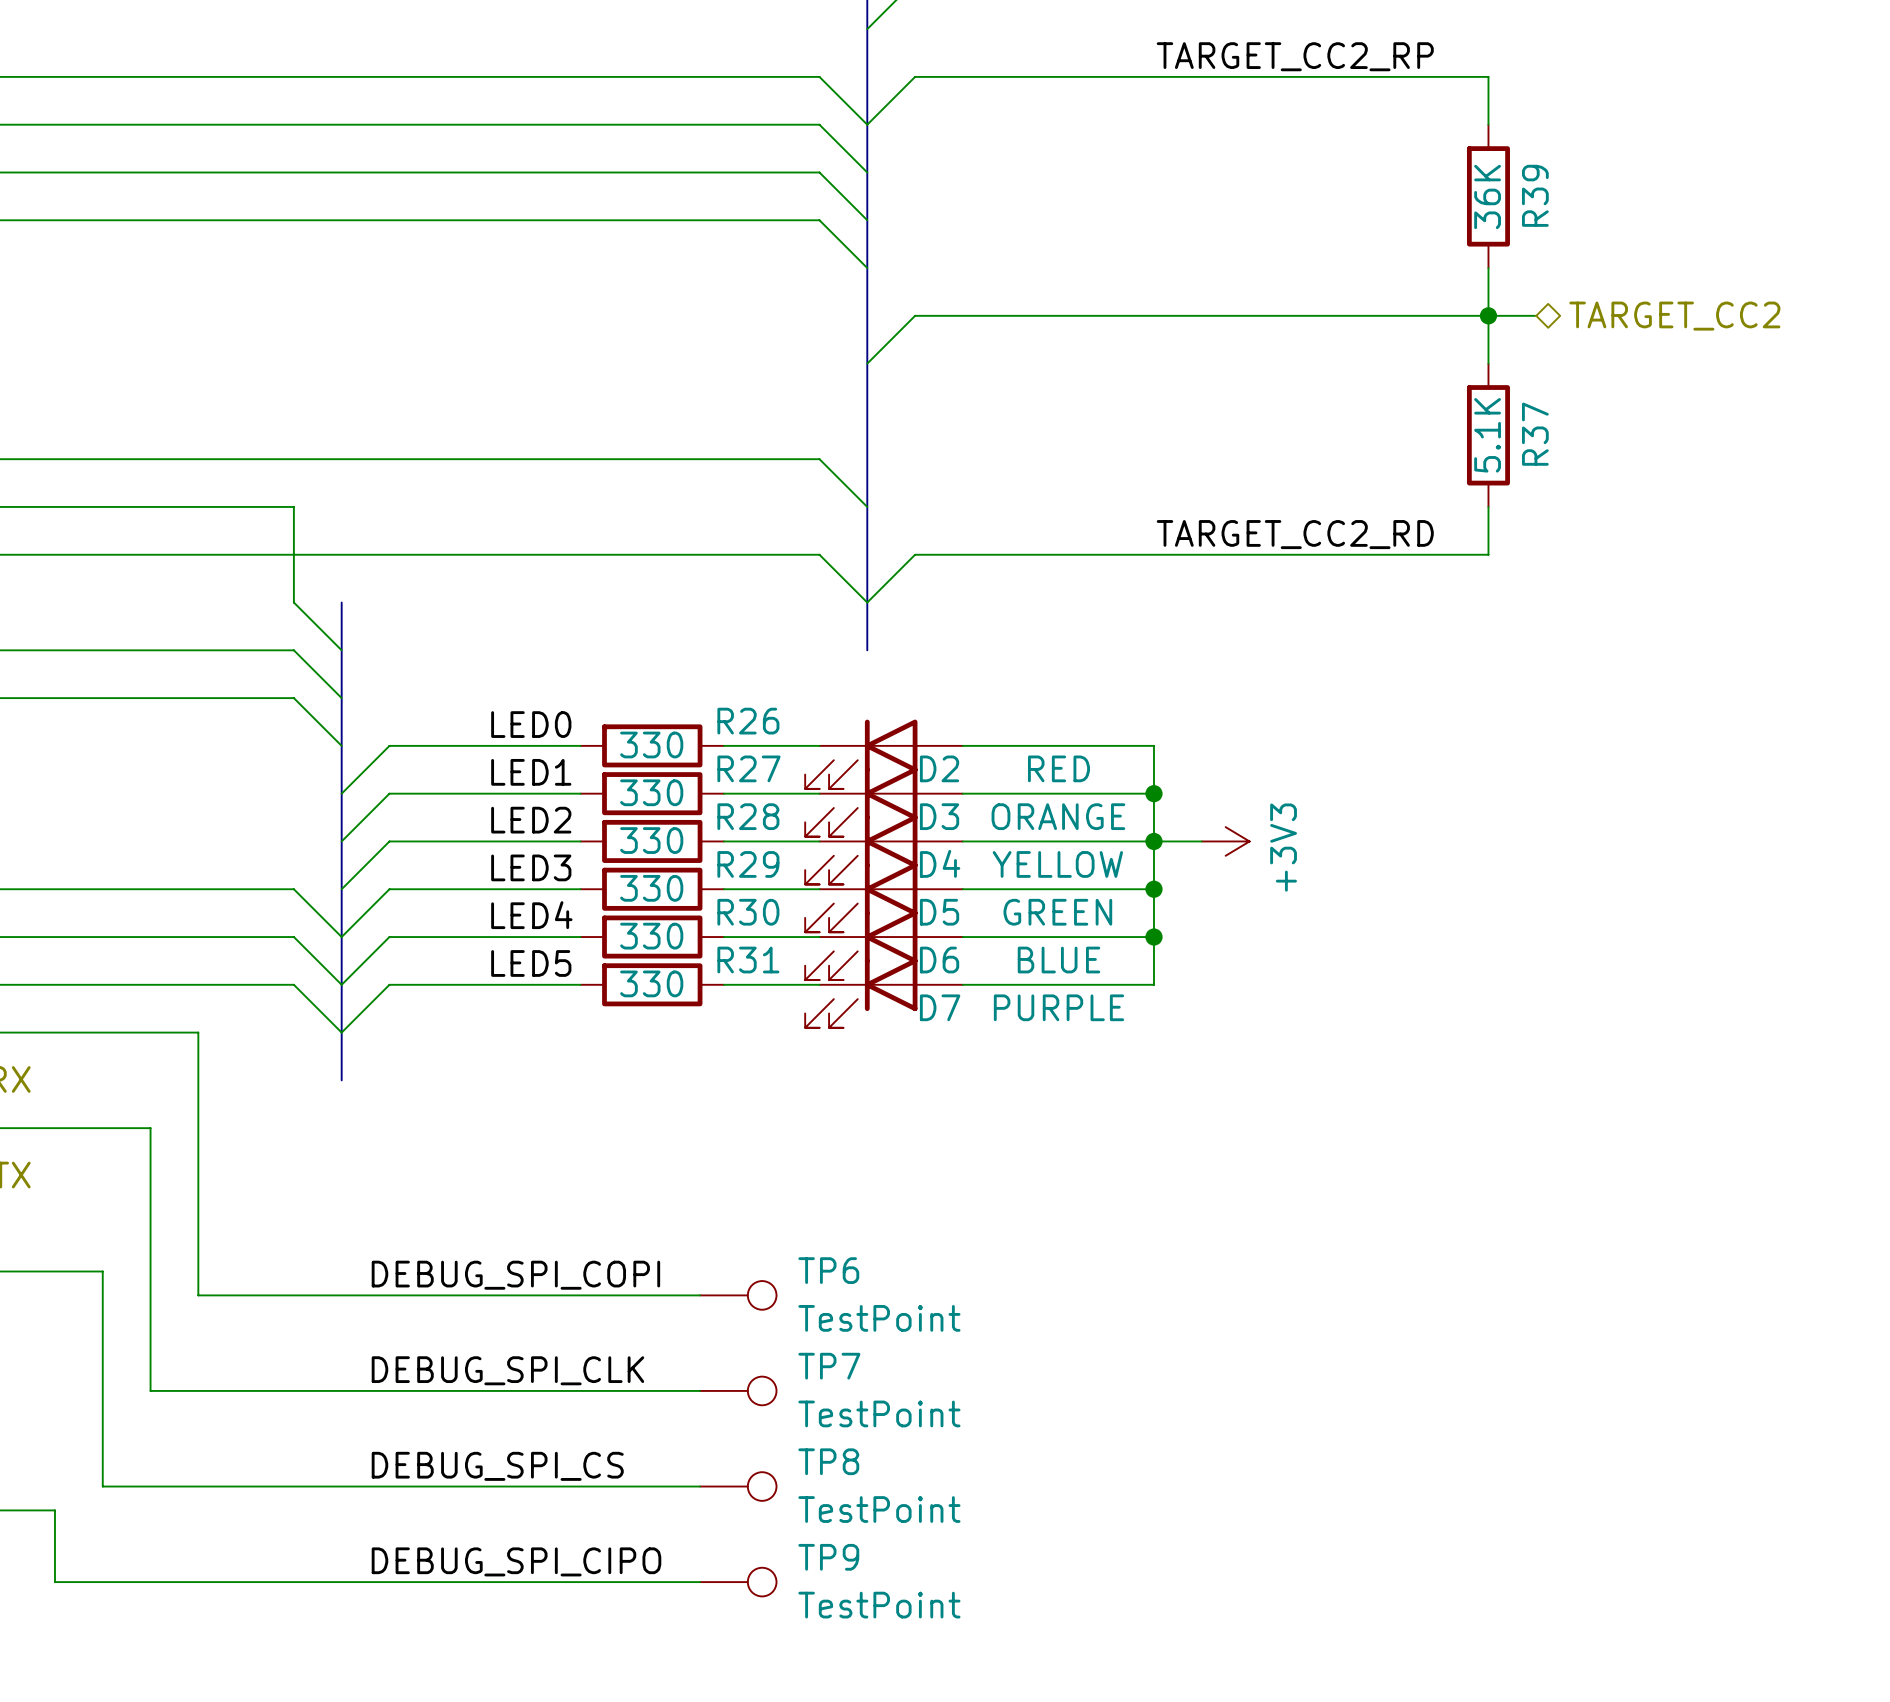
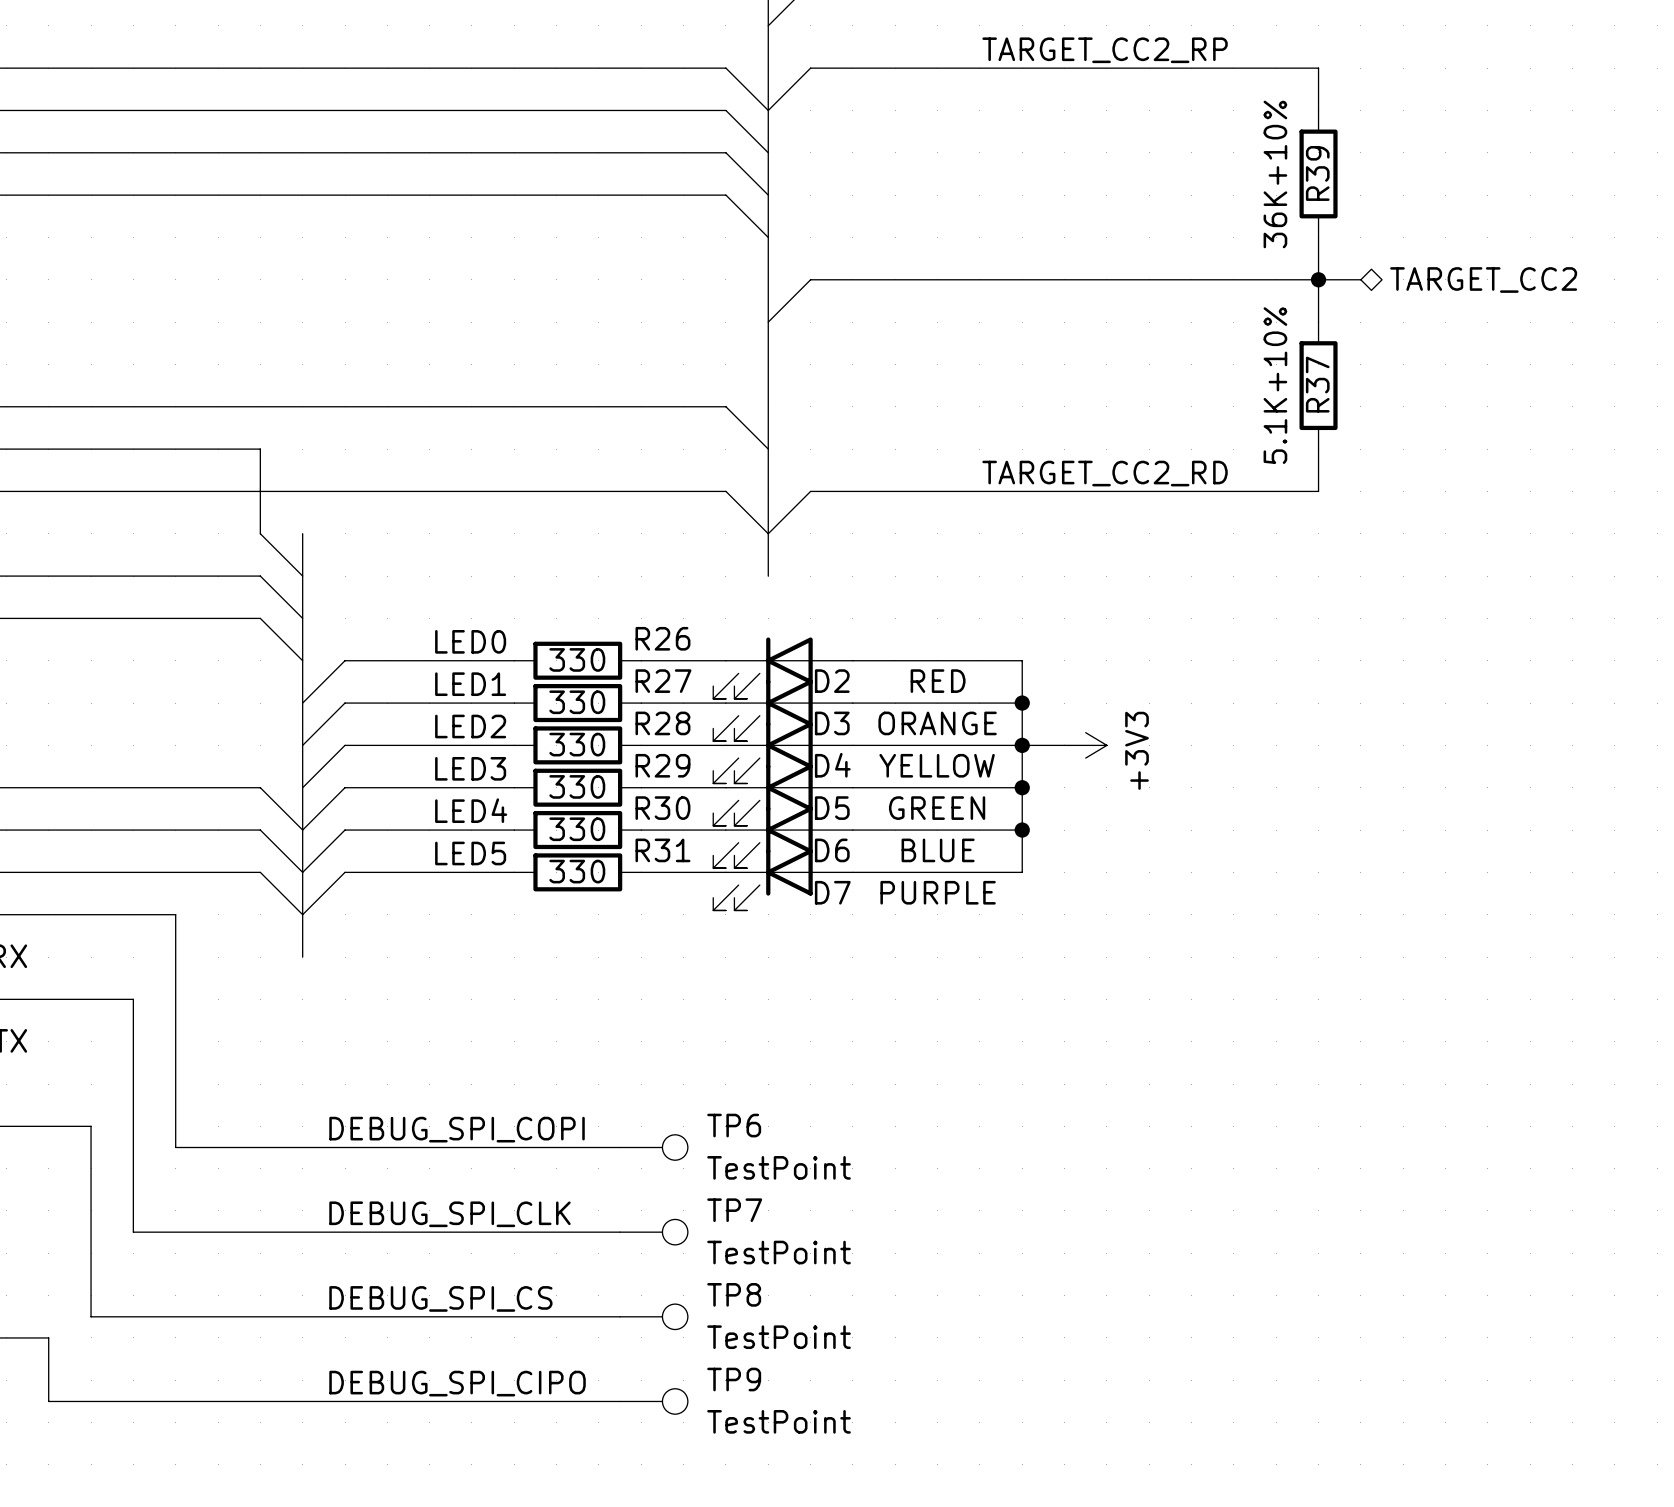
label position: TARGET_CC2_RP (1295, 56) -> TARGET_CC2_RP (1105, 50)
R39 name position: R39 (1535, 195) -> R39 (1317, 173)
R39 value: 36K (1487, 196) -> 36K+10% (1275, 174)
R37 name position: R37 (1535, 434) -> R37 (1317, 384)
R37 value: 5.1K (1487, 435) -> 5.1K+10% (1275, 385)
label position: TARGET_CC2_RD (1295, 534) -> TARGET_CC2_RD (1105, 473)

